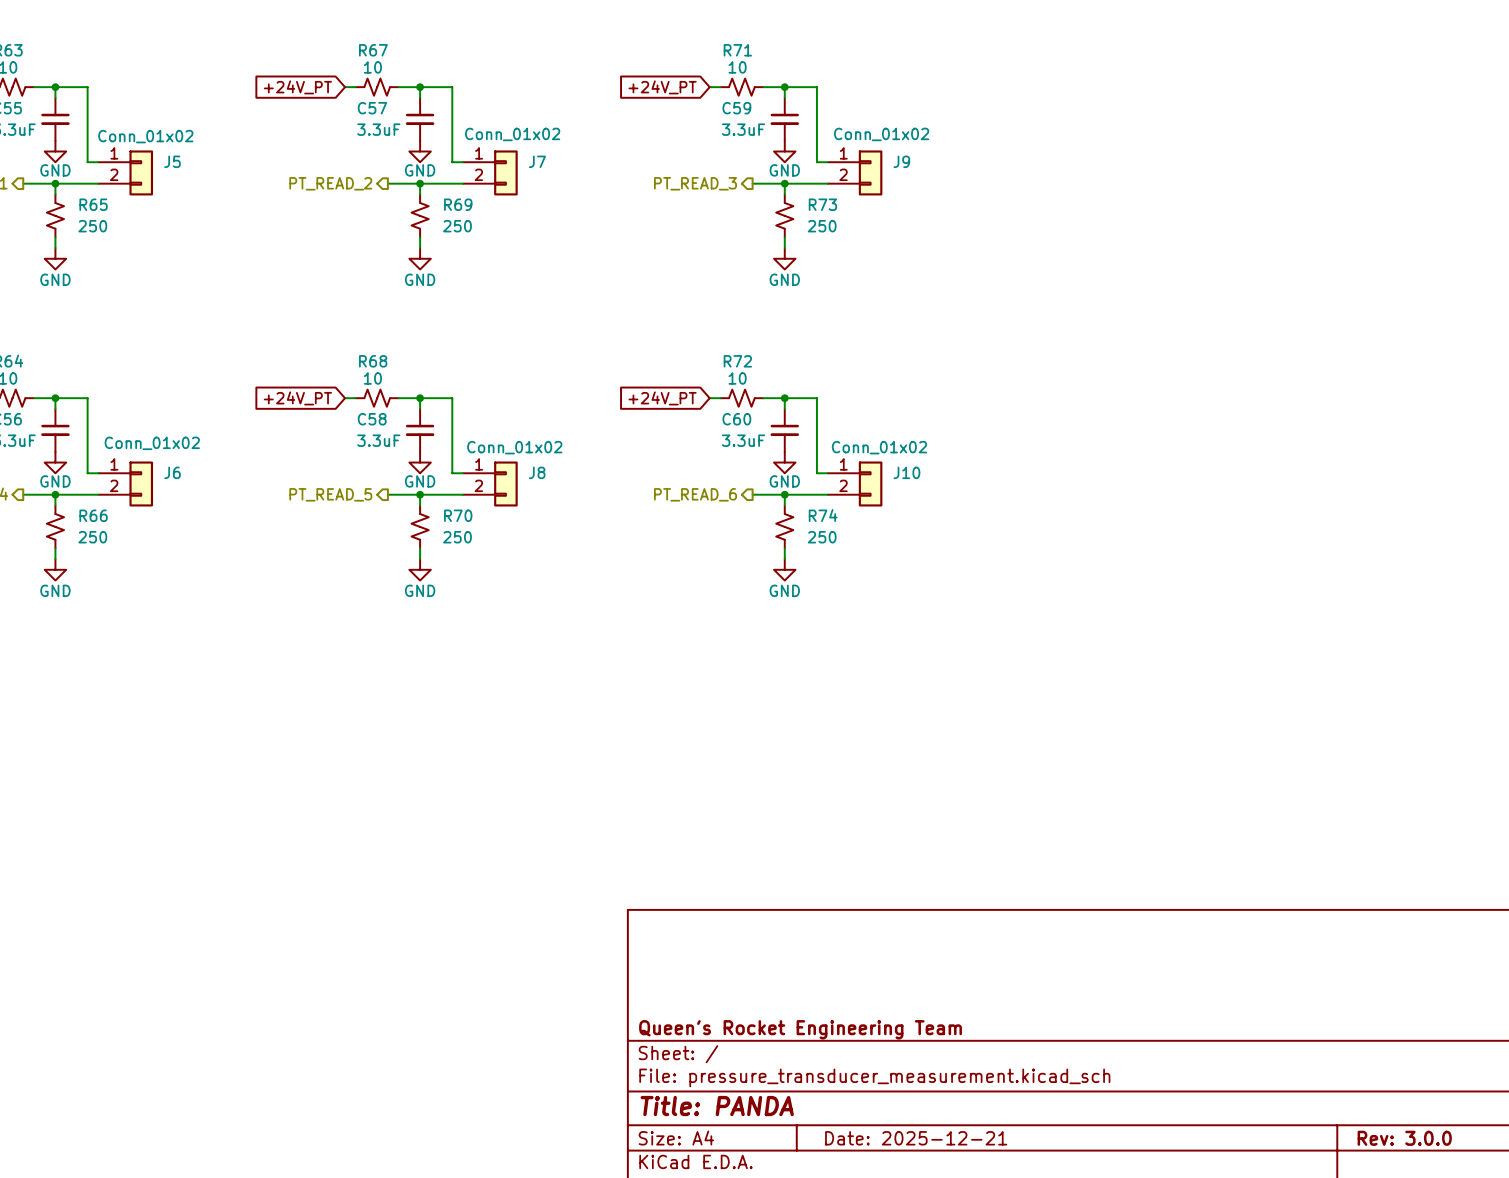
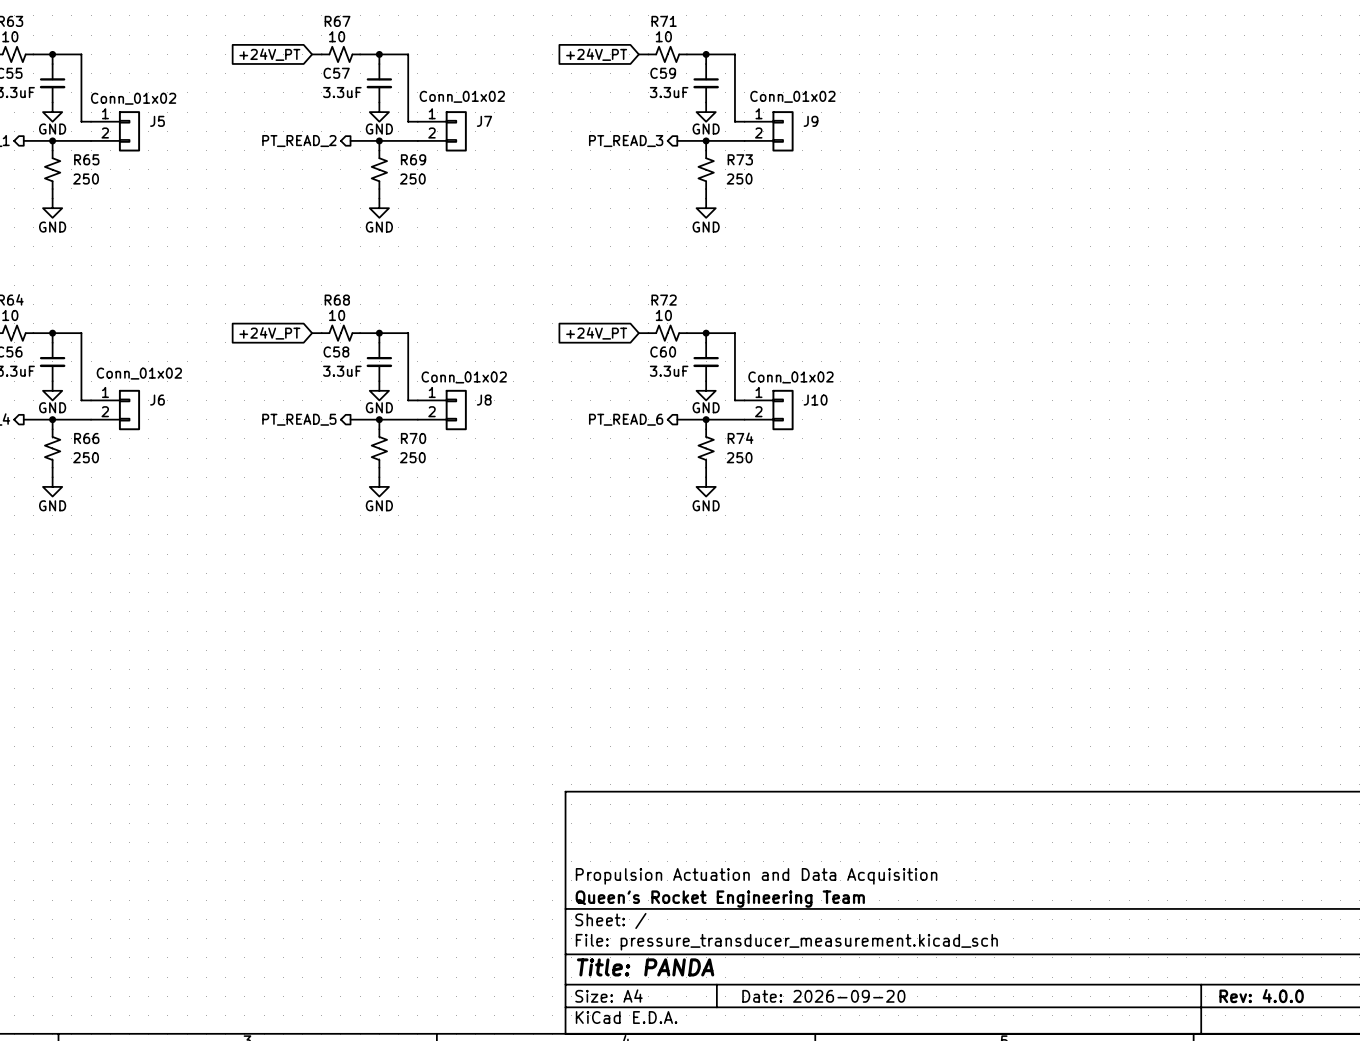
title block: none -> Propulsion Actuation and Data Acquisition (756, 876)
title block: Date: 2025-12-21 (916, 1138) -> Date: 2026-09-20 (823, 996)
title block: Rev: 3.0.0 (1404, 1138) -> Rev: 4.0.0 (1261, 996)

